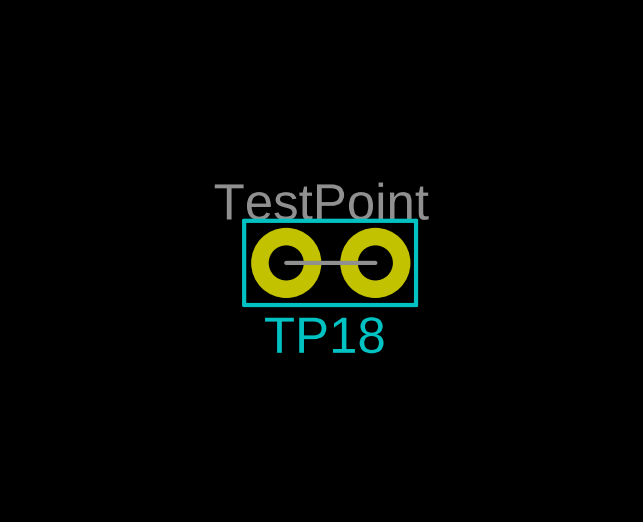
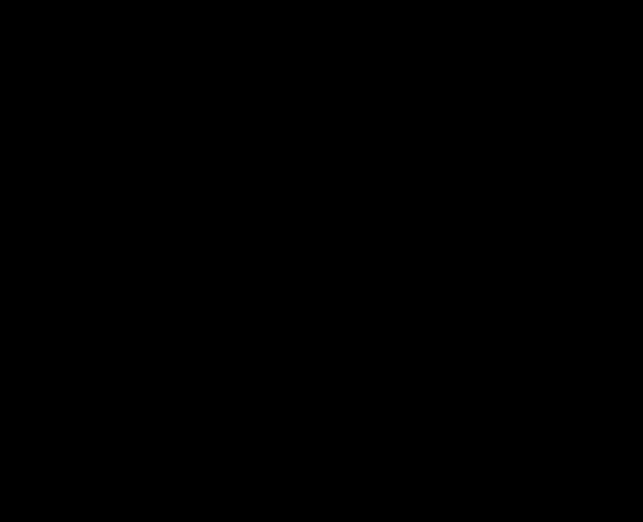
TP18: TestPoint (330, 262) -> none

